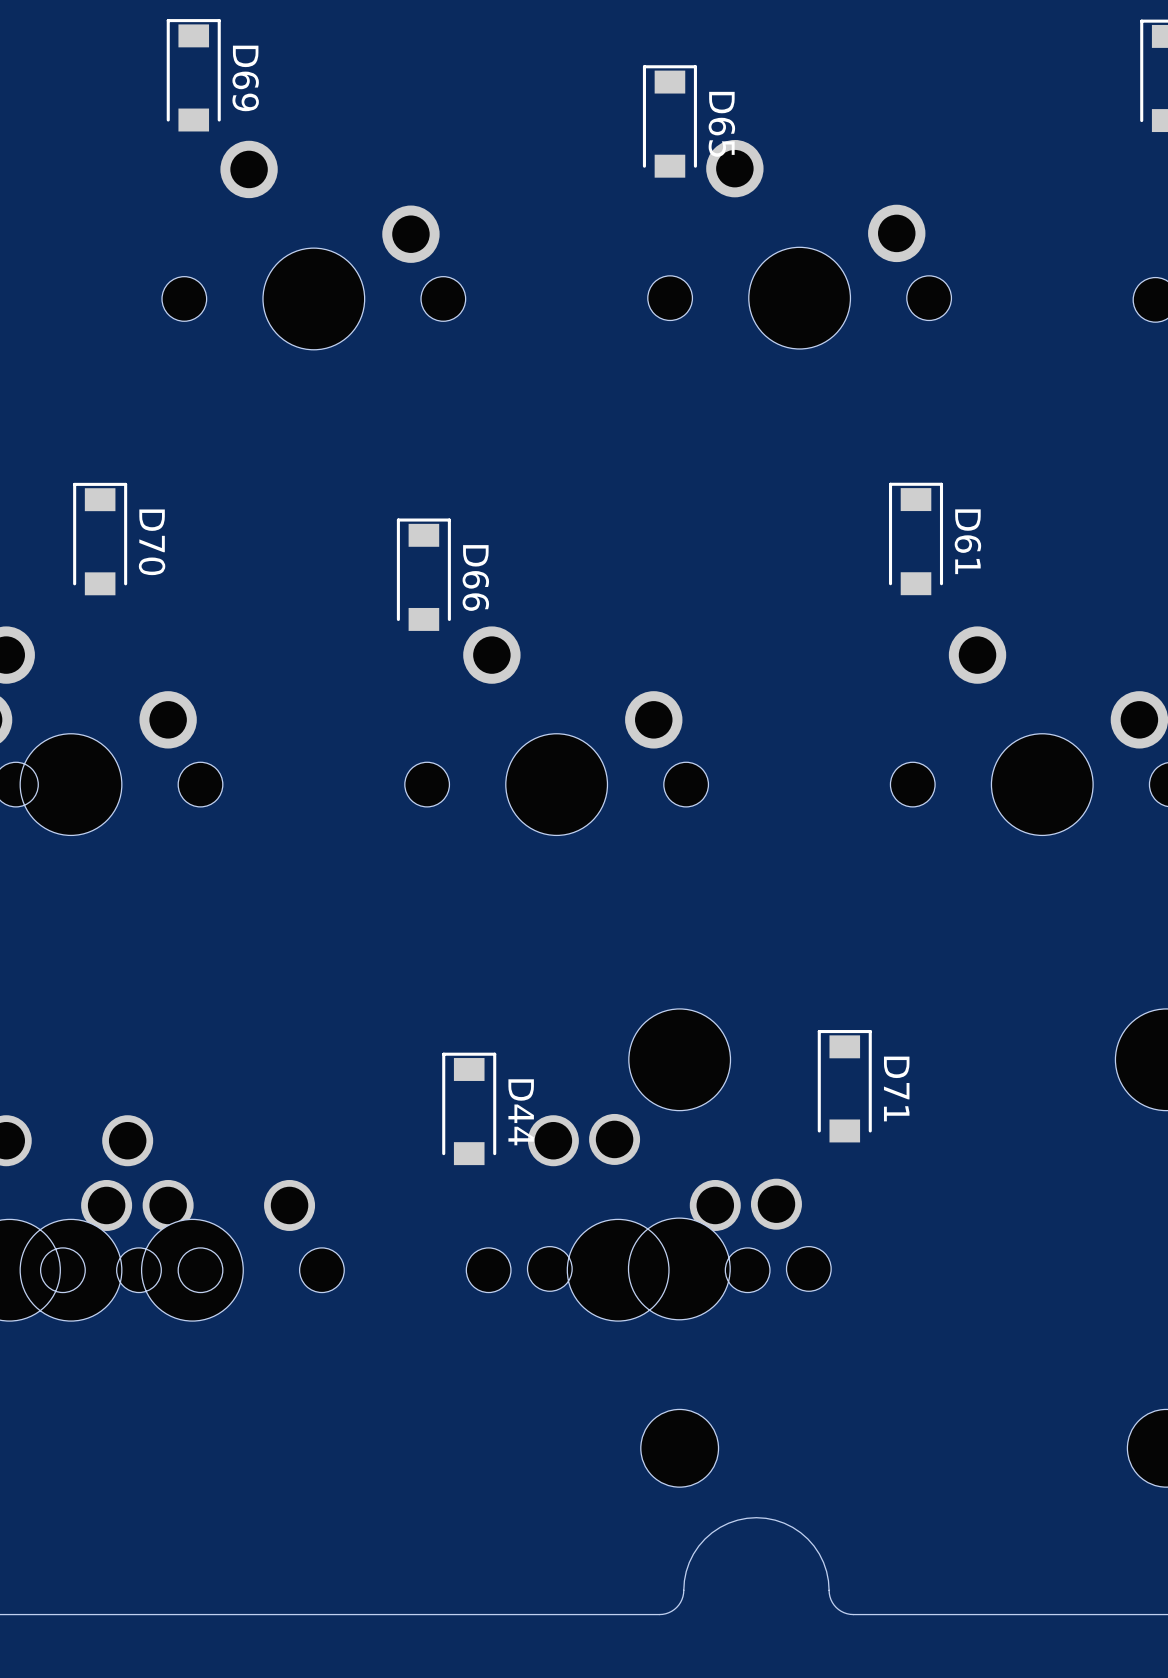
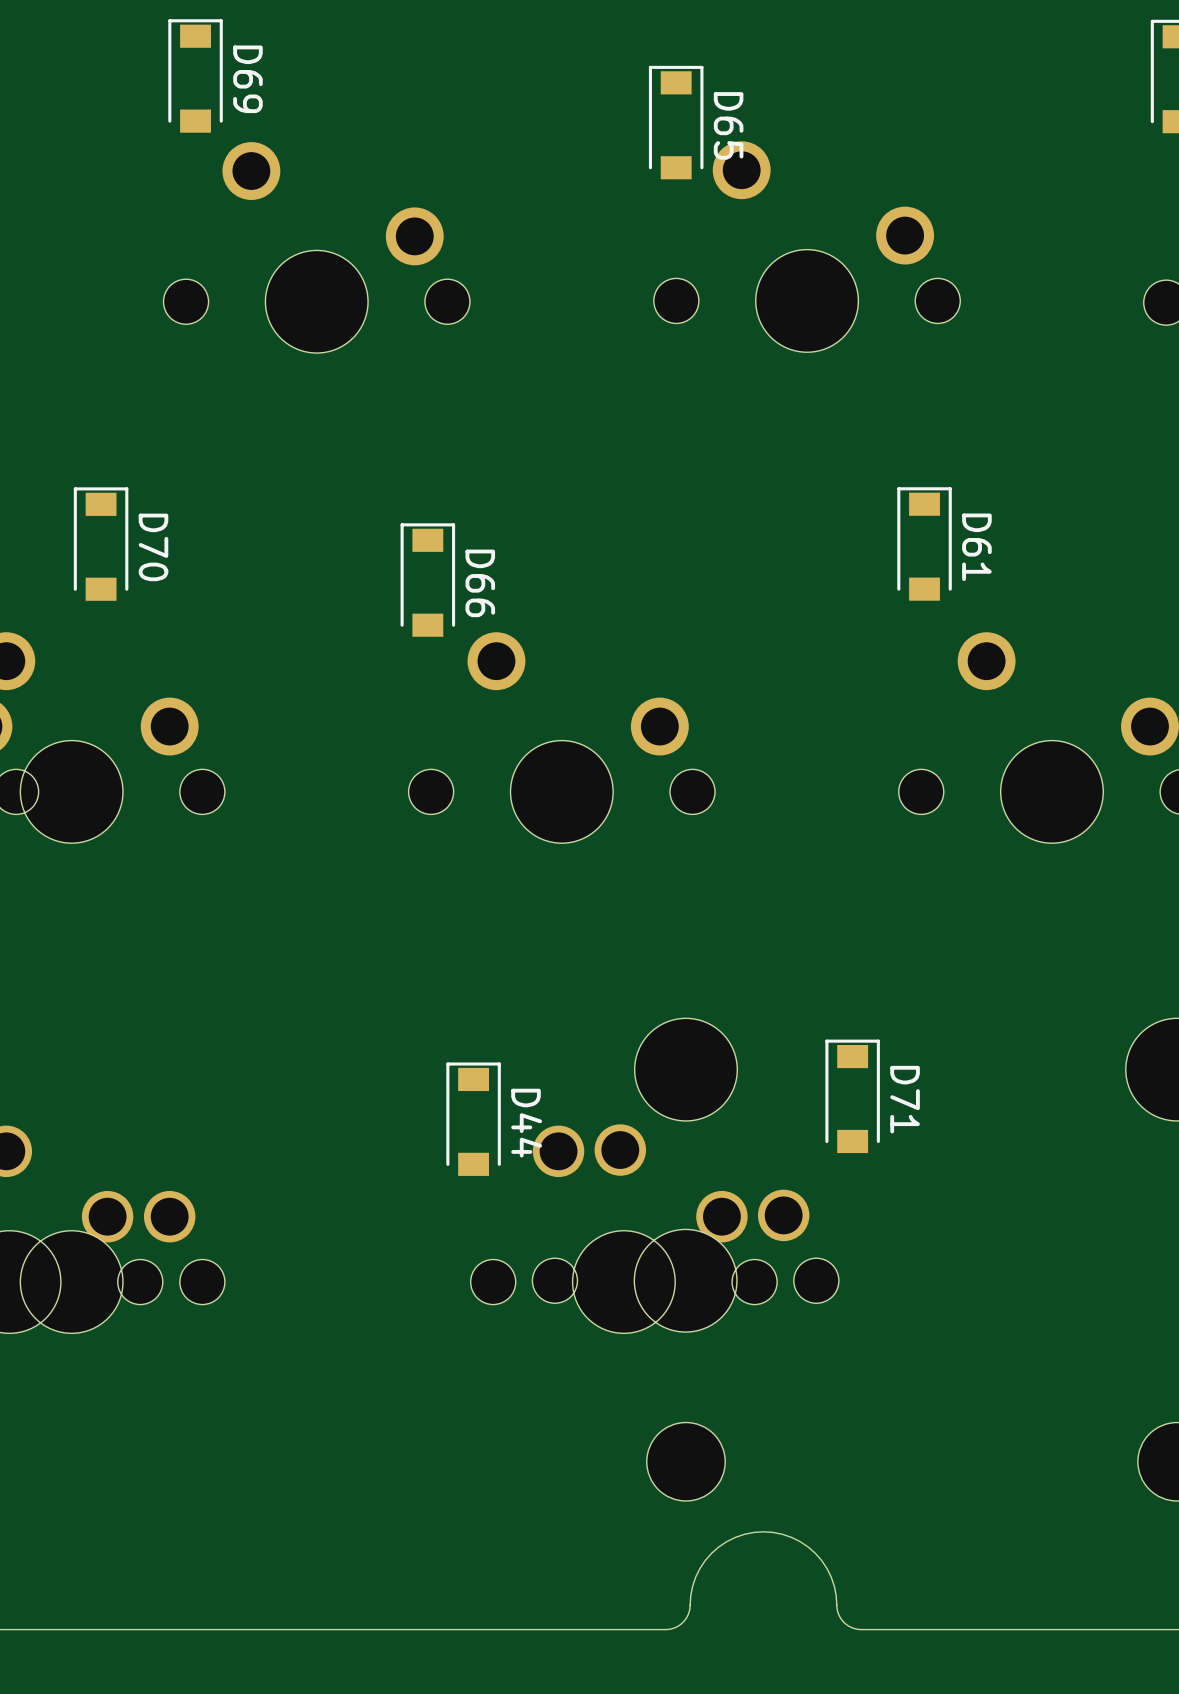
part: (192, 1218) -> none

